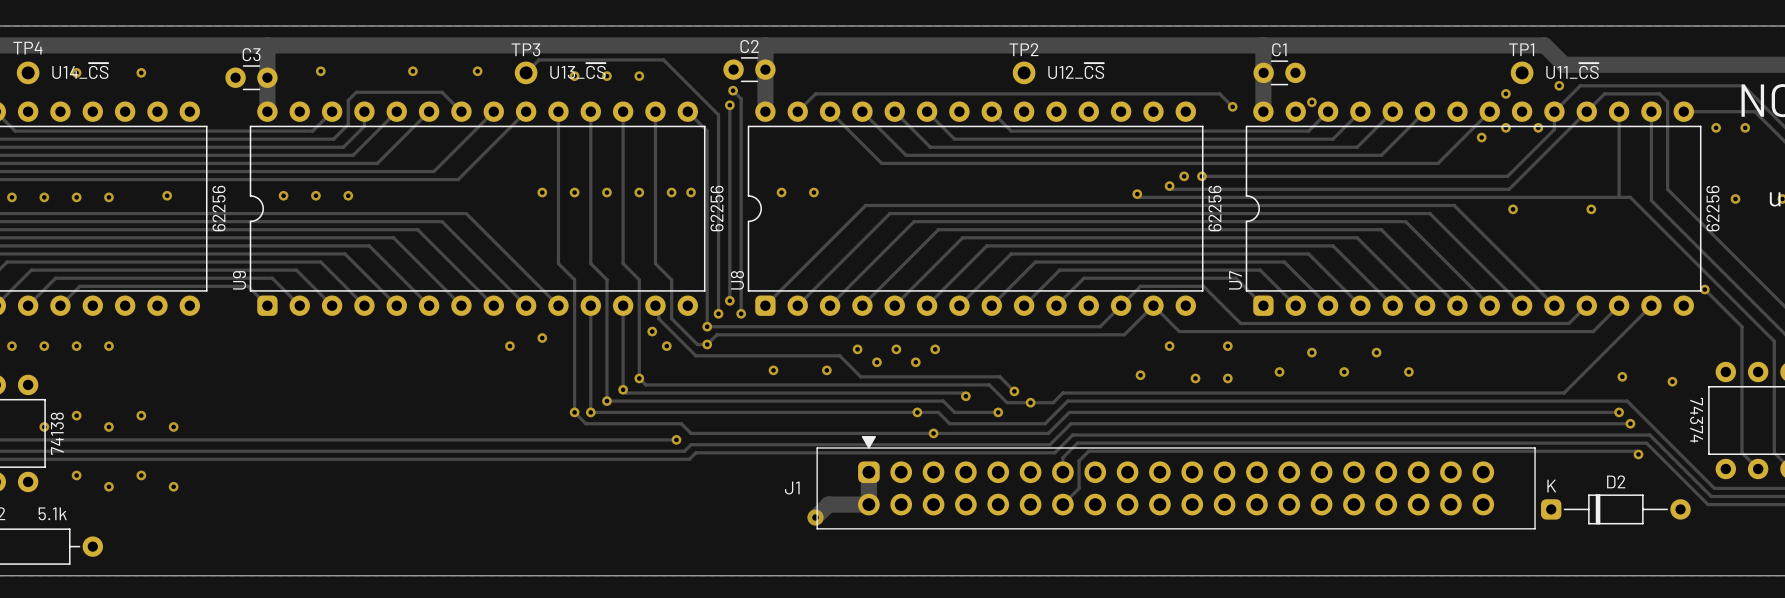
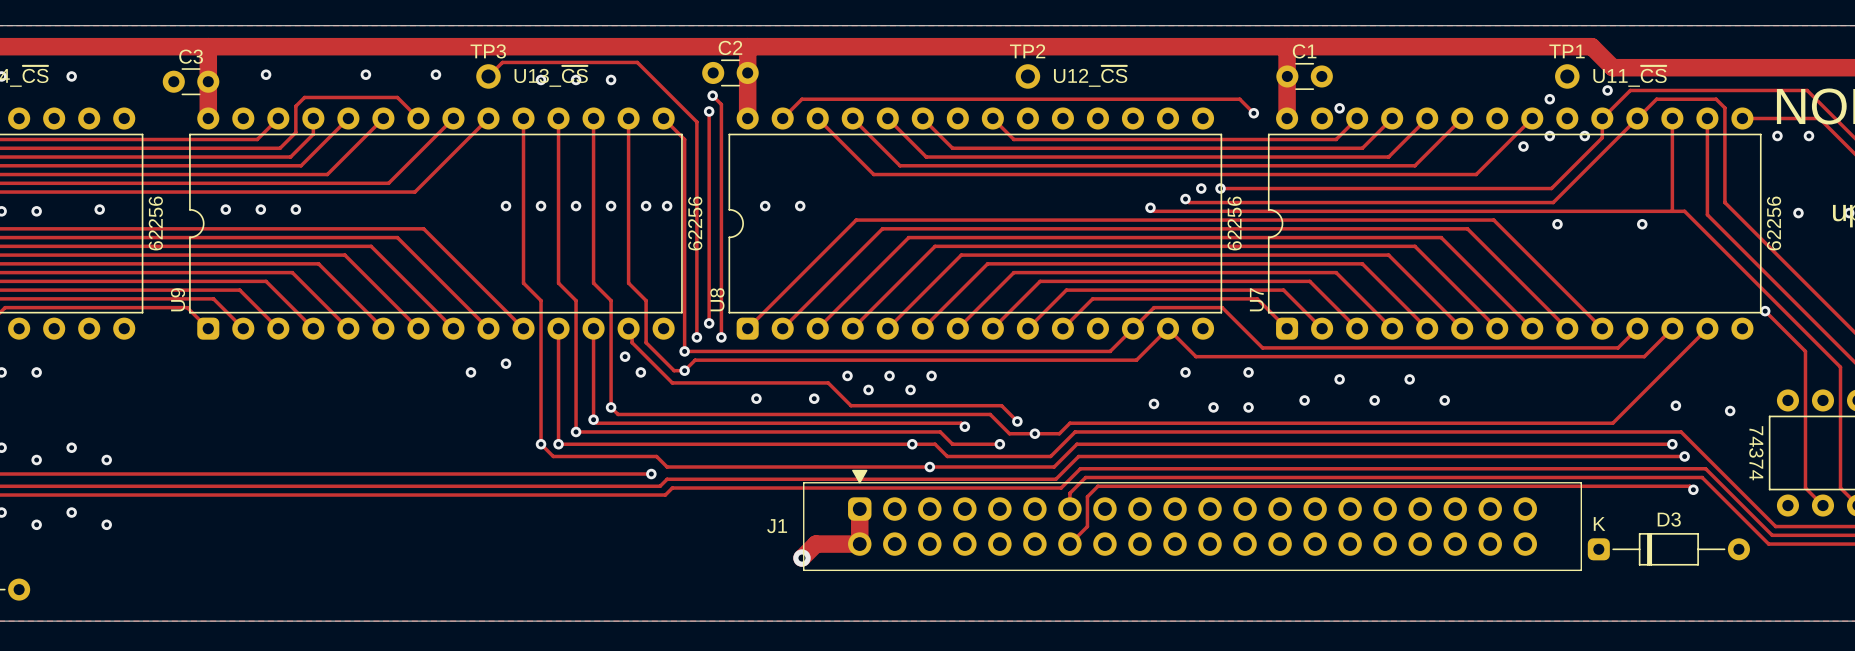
D2 name: D2 (1616, 481) -> D3 (1669, 519)

